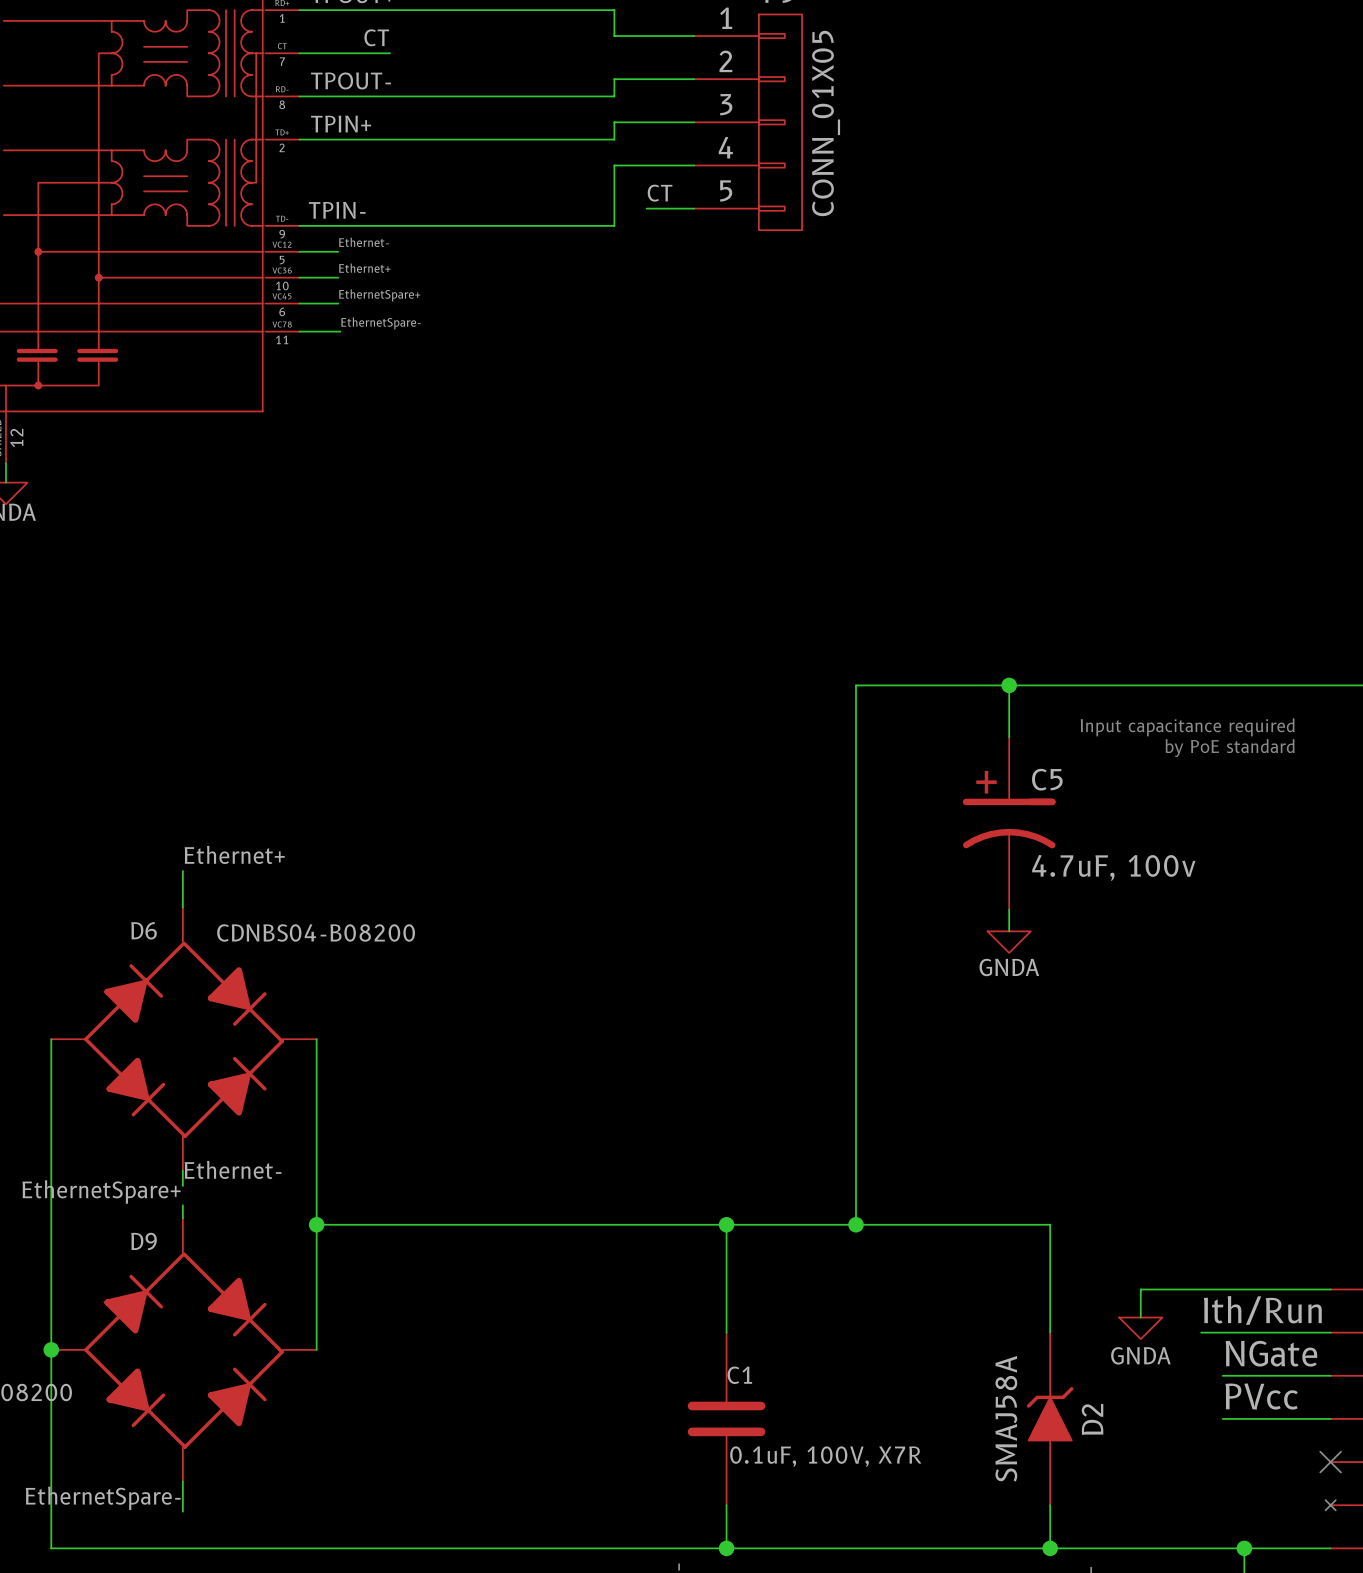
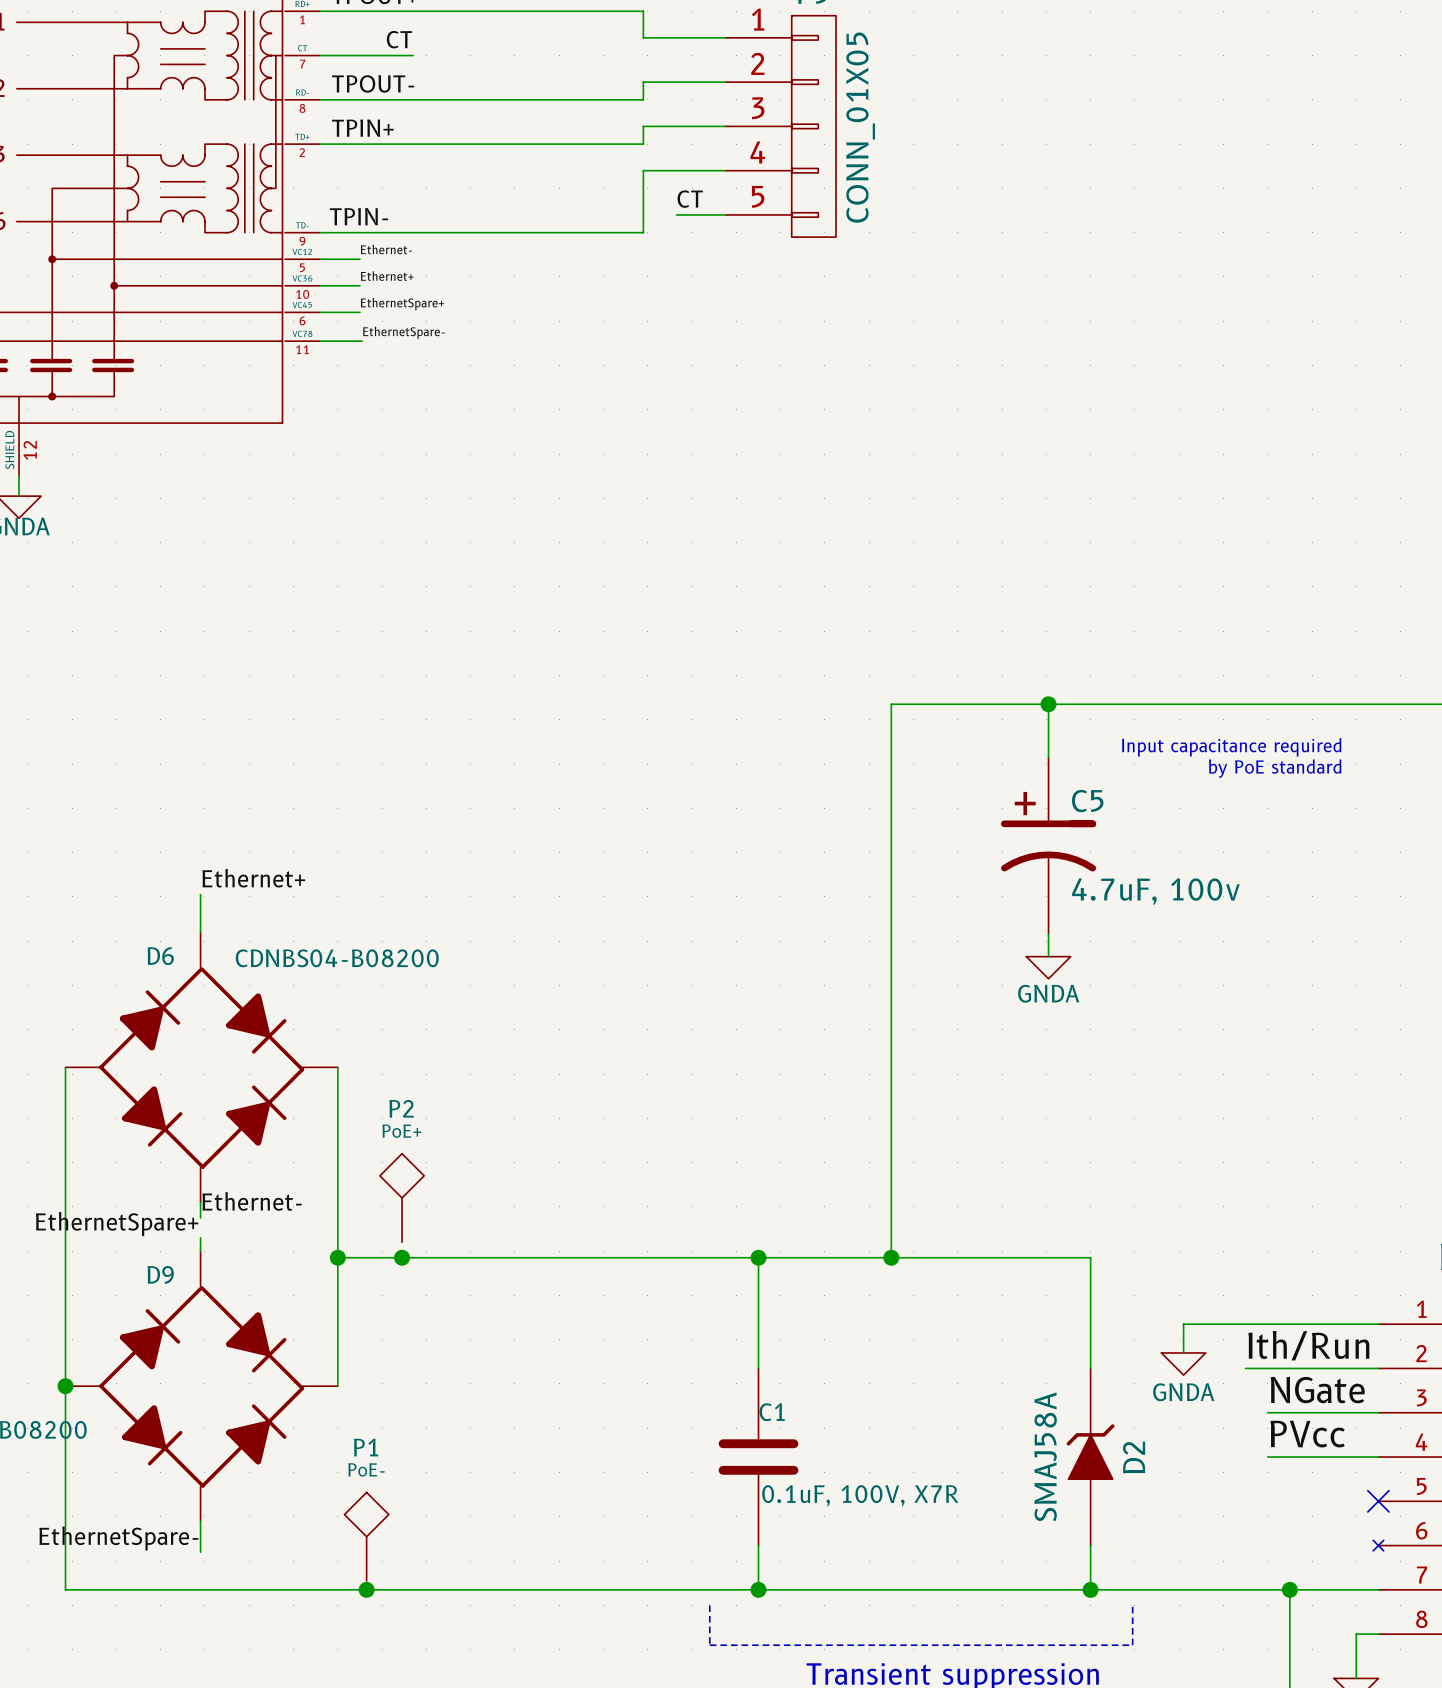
P2: none -> PoE+ (402, 1197)
junction: none -> (402, 1257)
P1: none -> PoE- (366, 1536)
junction: none -> (366, 1589)

